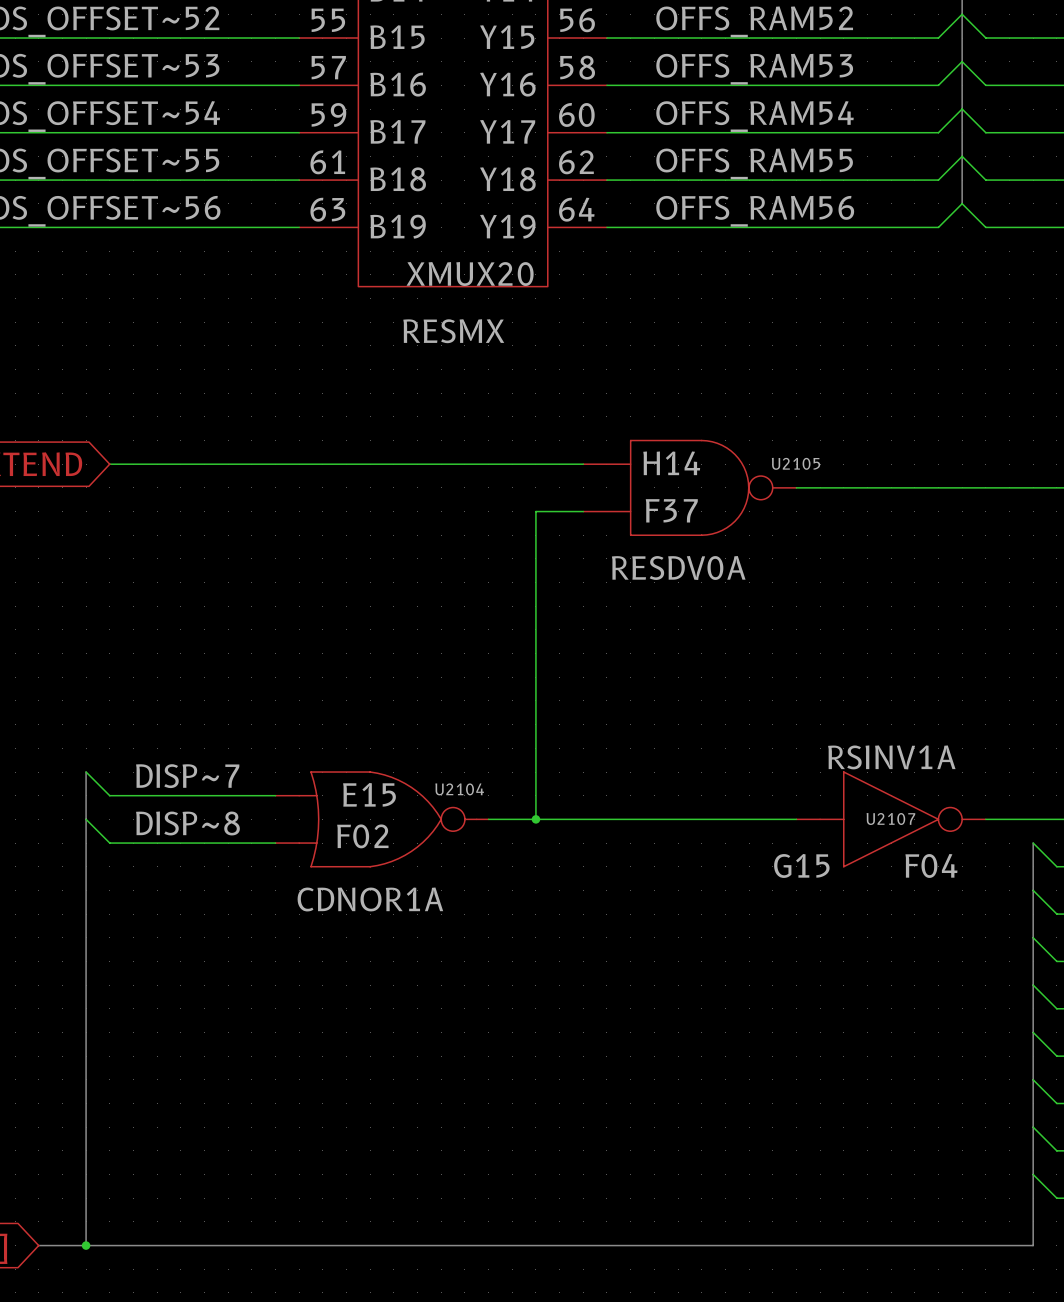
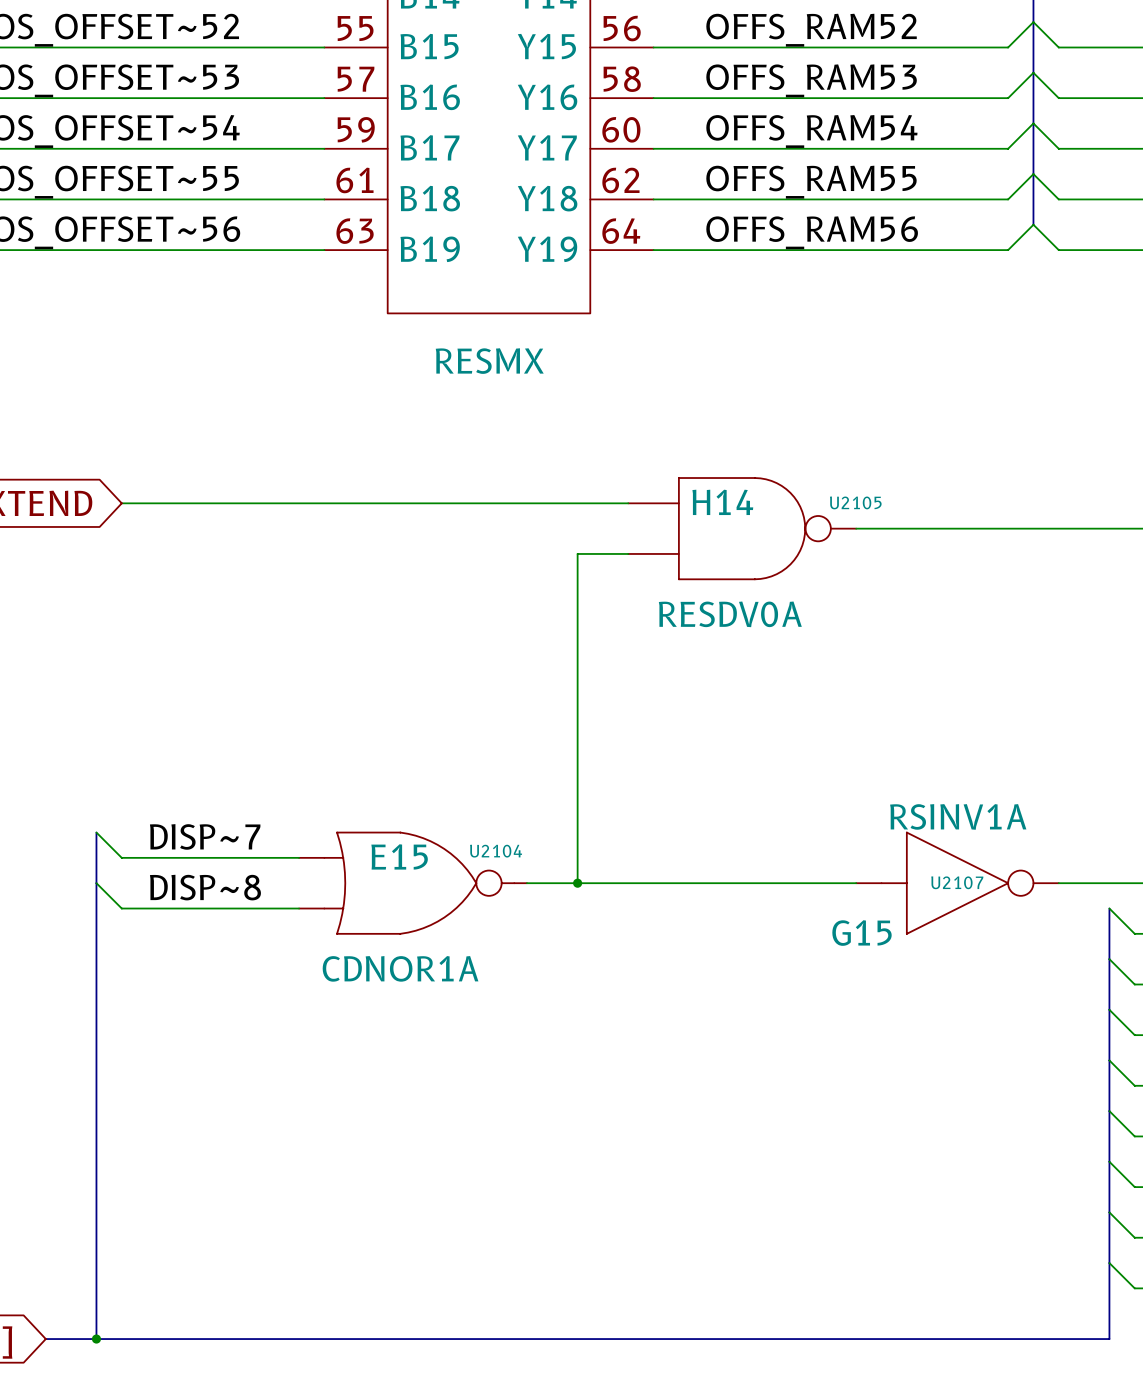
part value: XMUX20 (470, 274) -> none
U2105 value: F37 (671, 510) -> none
U2104 value: F02 (362, 836) -> none
U2107 value: F04 (931, 865) -> none

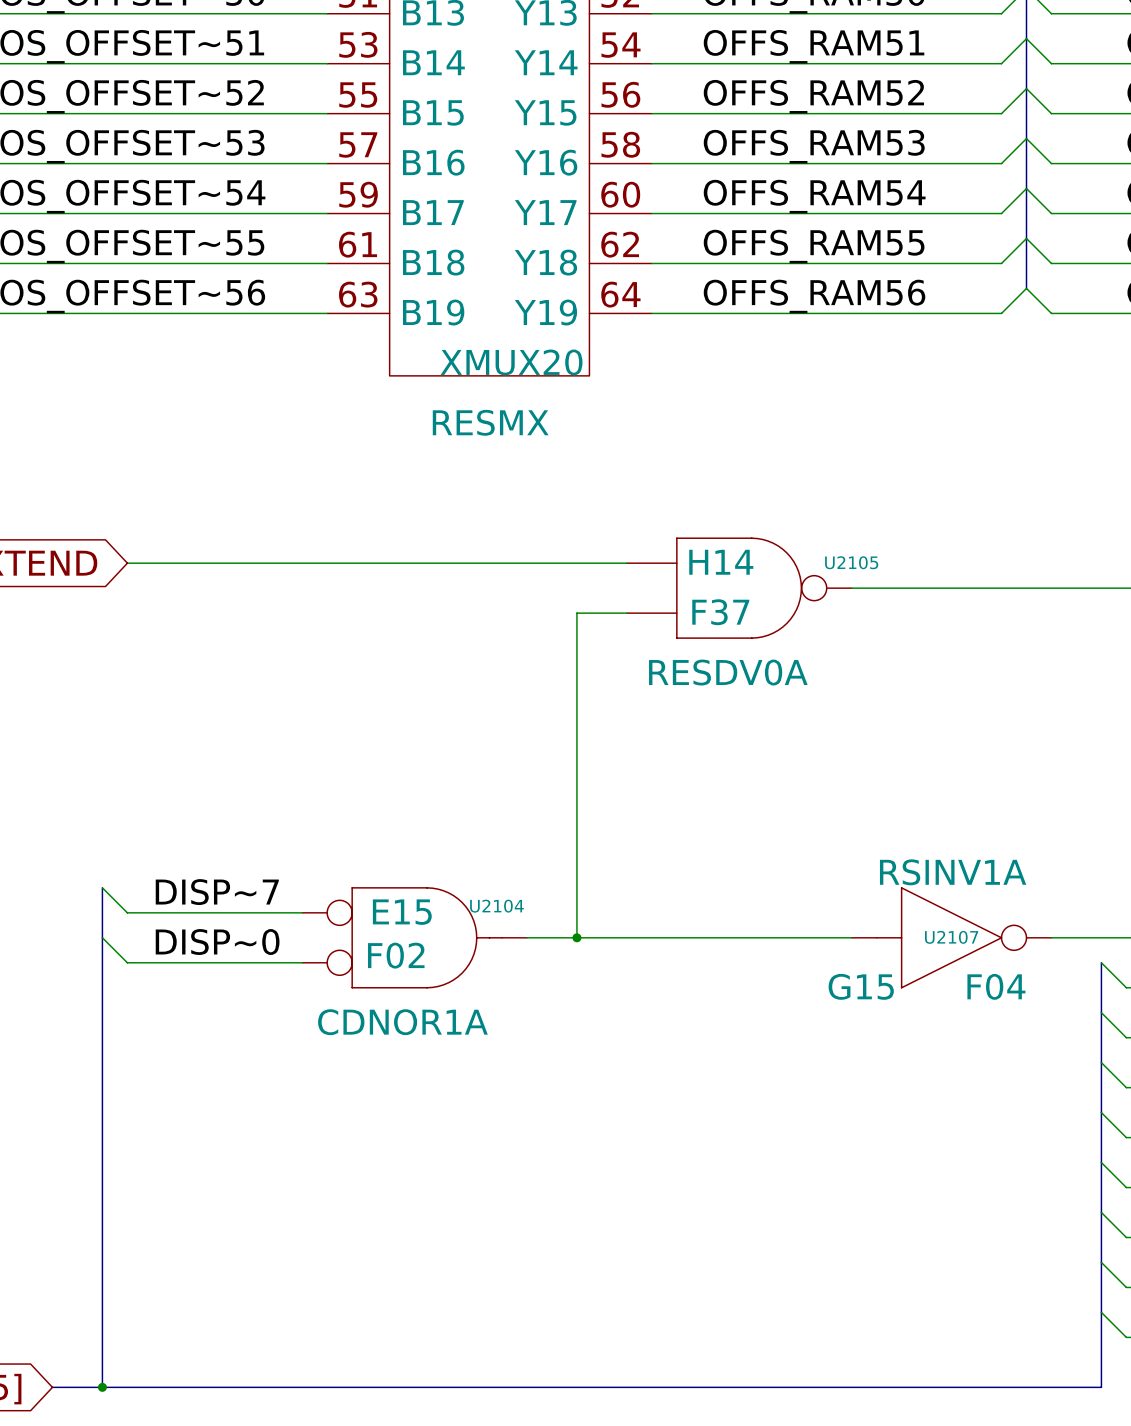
part value: none -> XMUX20 (511, 362)
U2105 value: none -> F37 (720, 612)
U2104 symbol: [299, 831, 527, 935] -> [302, 887, 528, 989]
label: DISP~8 (205, 887) -> DISP~0 (217, 942)
U2104 value: none -> F02 (396, 955)
U2107 value: none -> F04 (996, 986)

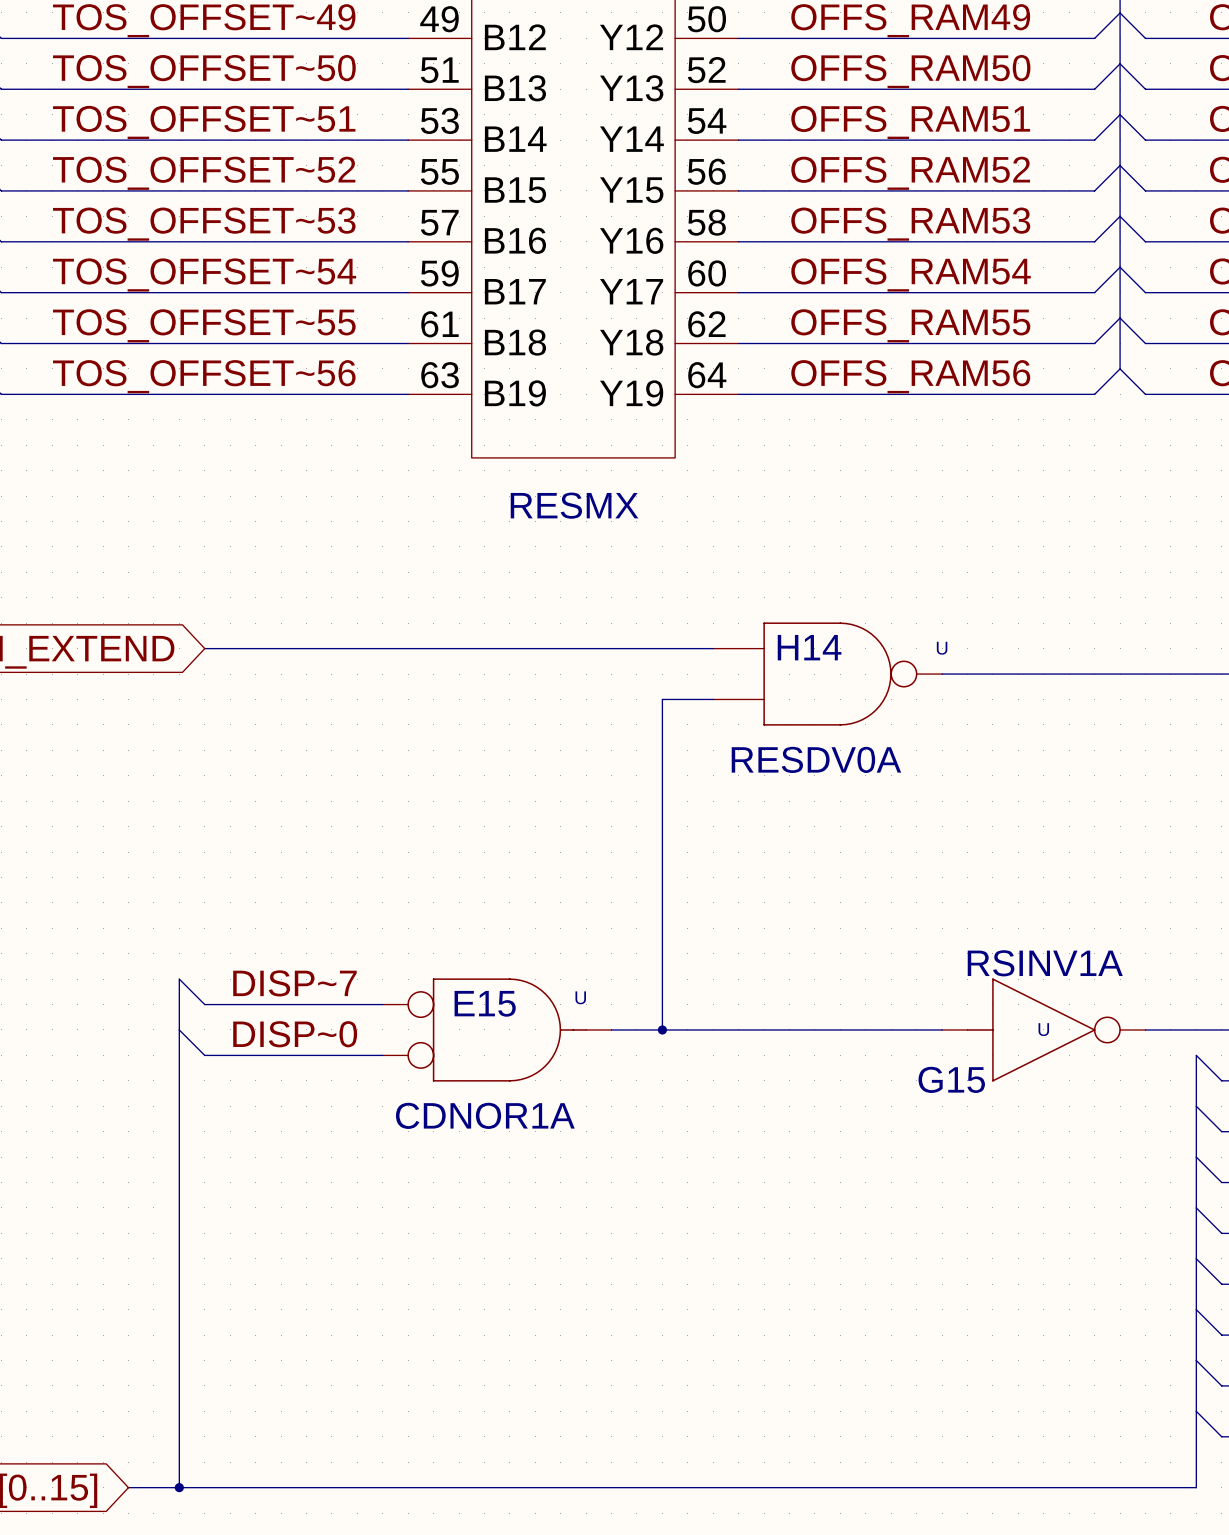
part value: XMUX20 (511, 362) -> none
U2105 name: U2105 (851, 562) -> U (942, 648)
U2105 value: F37 (720, 612) -> none
U2104 name: U2104 (496, 906) -> U (580, 997)
U2107 name: U2107 (951, 937) -> U (1043, 1029)
U2104 value: F02 (396, 955) -> none
U2107 value: F04 (996, 986) -> none

